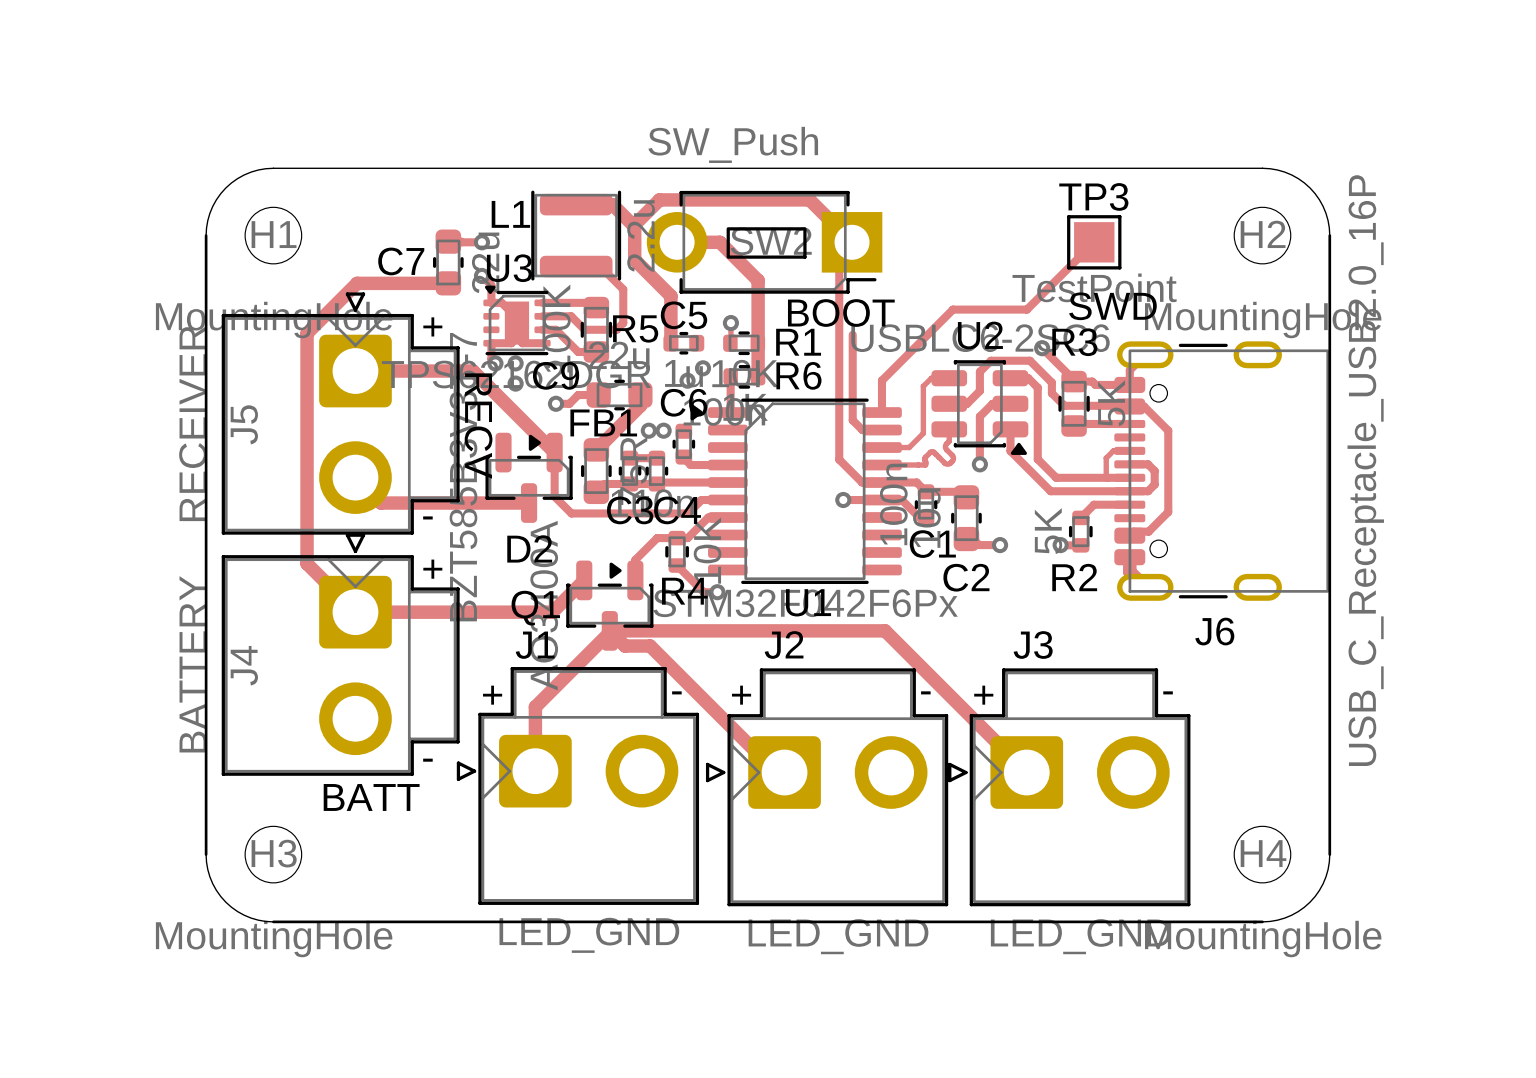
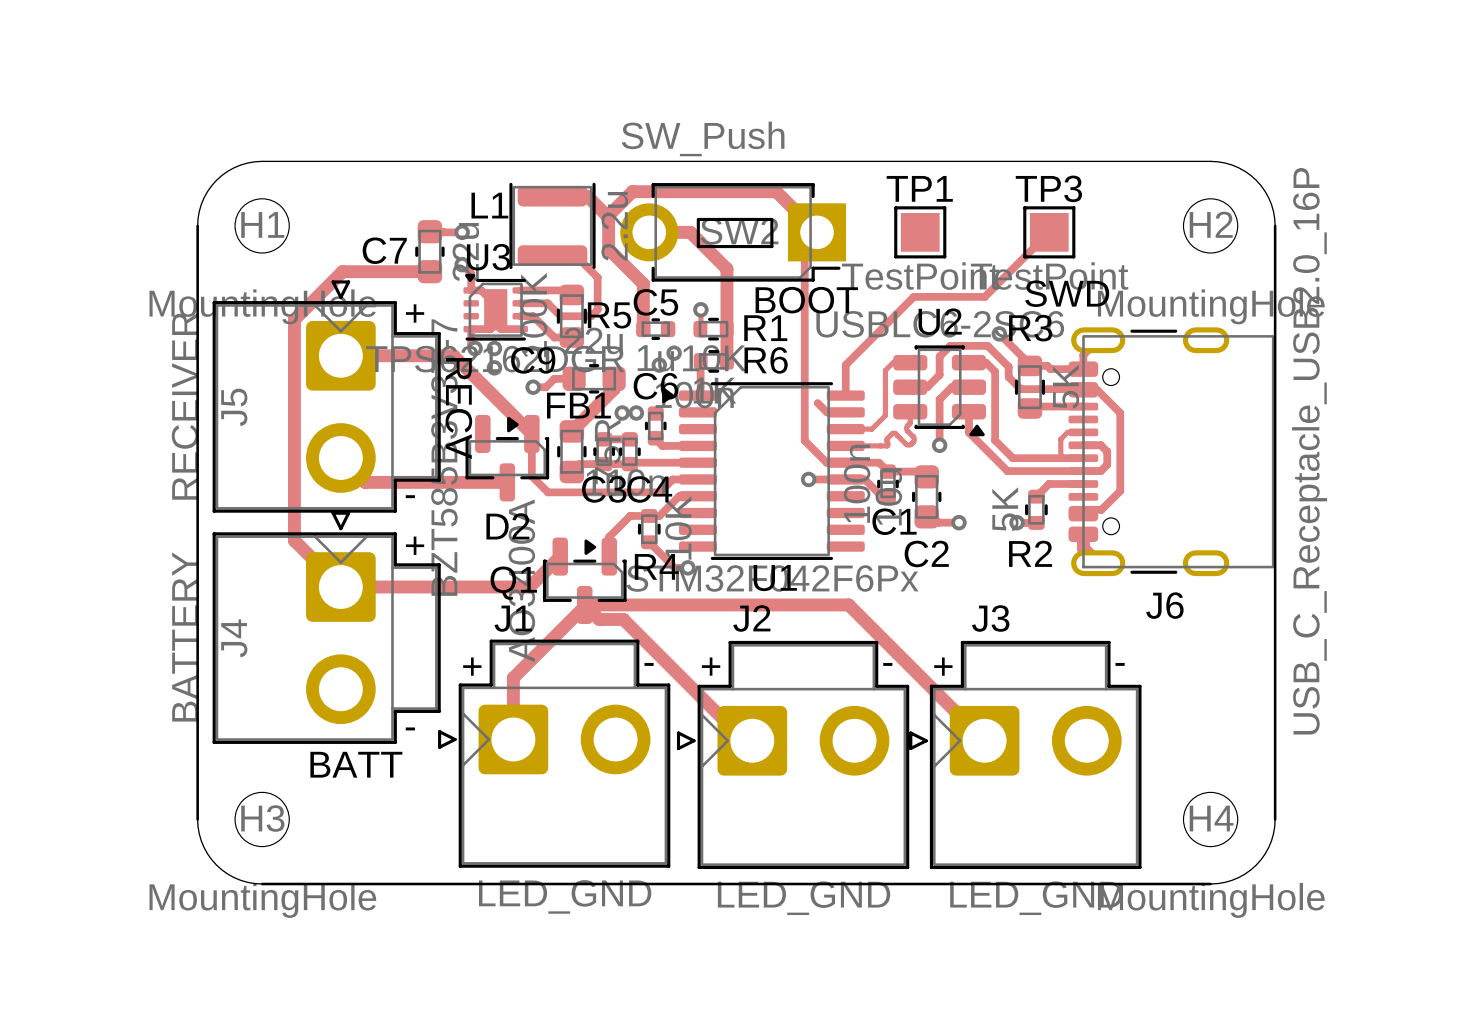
TP1: none -> TestPoint (920, 232)
top track: (852, 334) (852, 420) -> none

